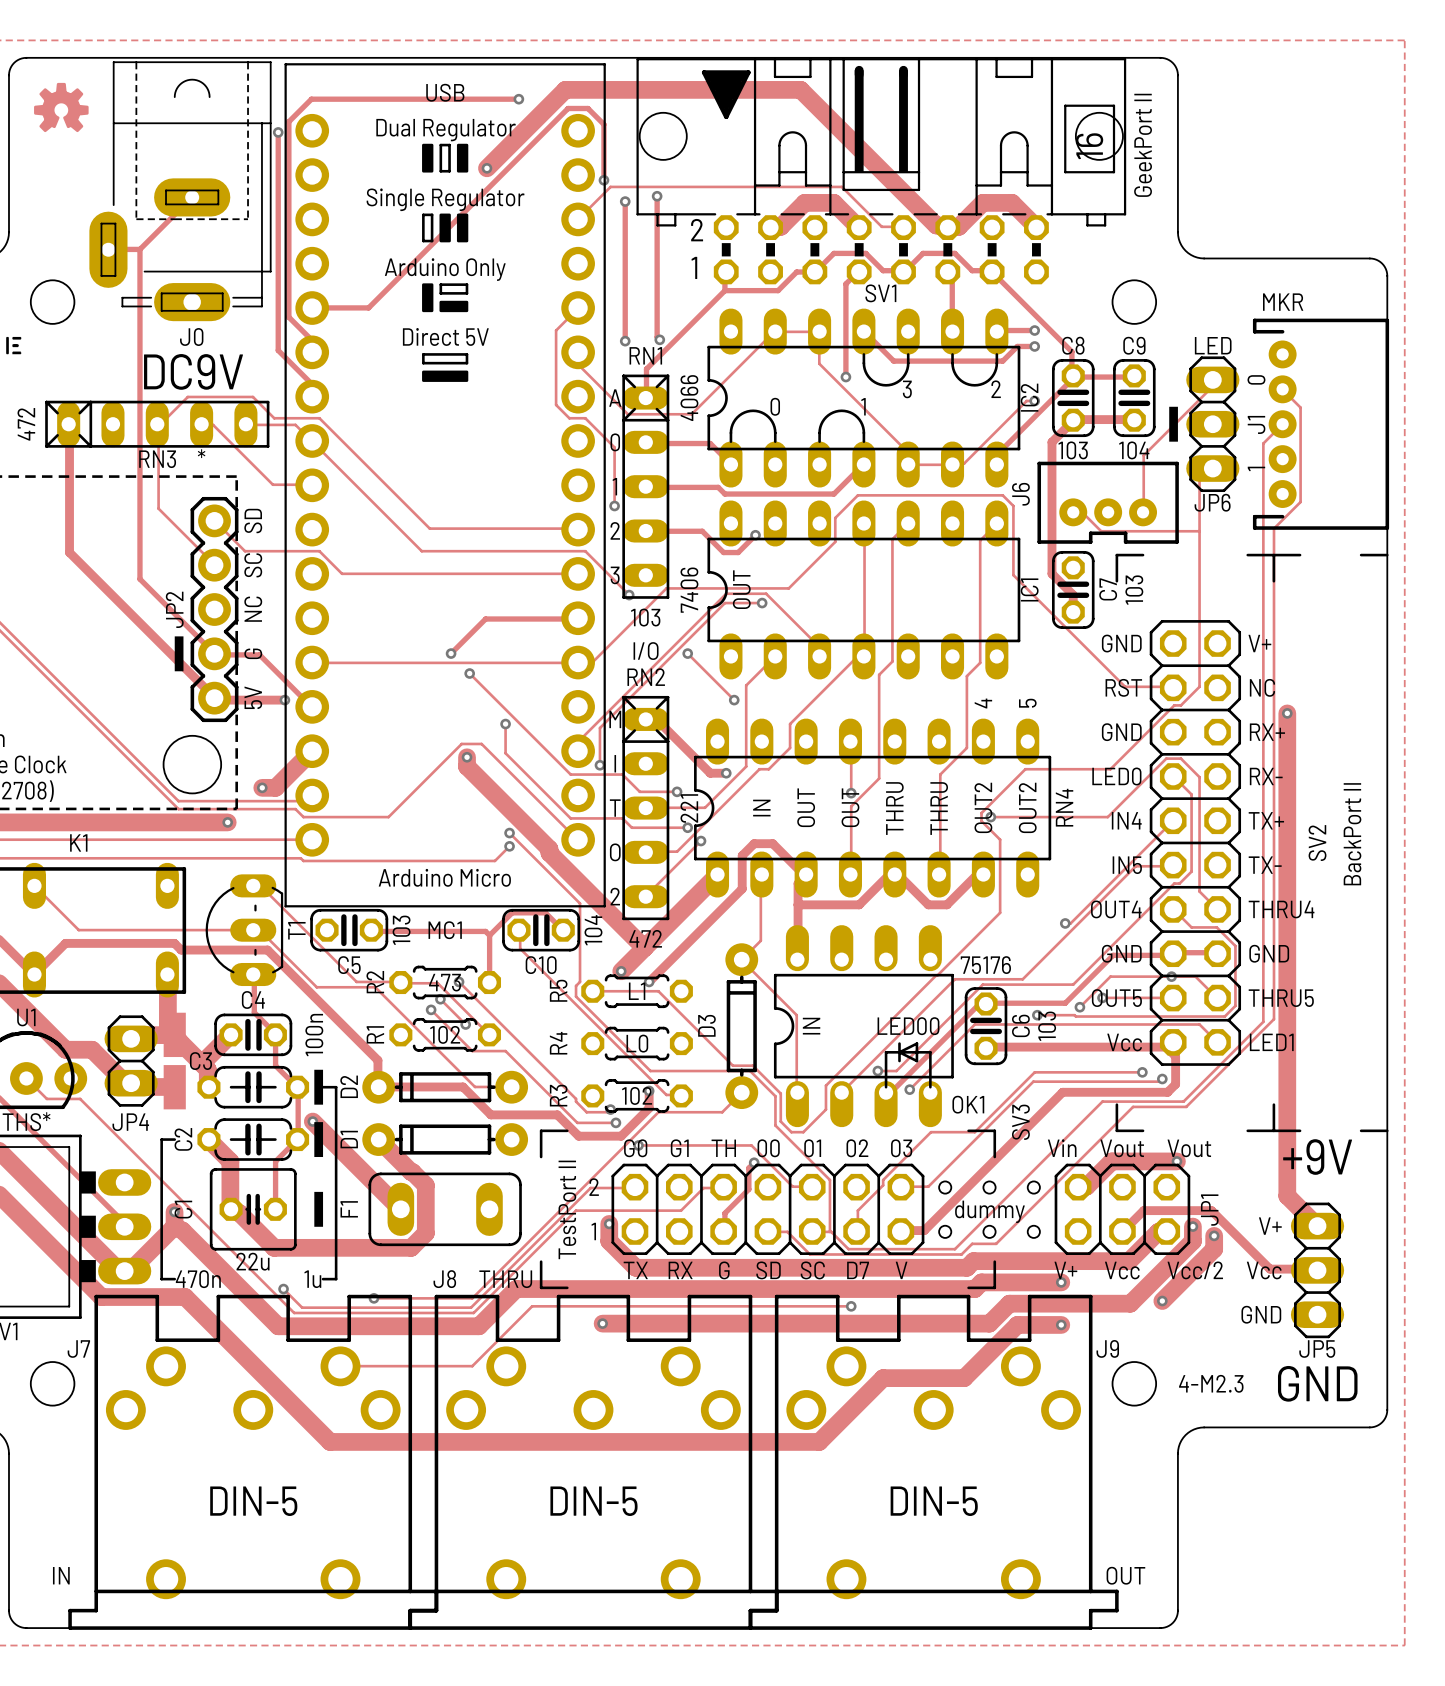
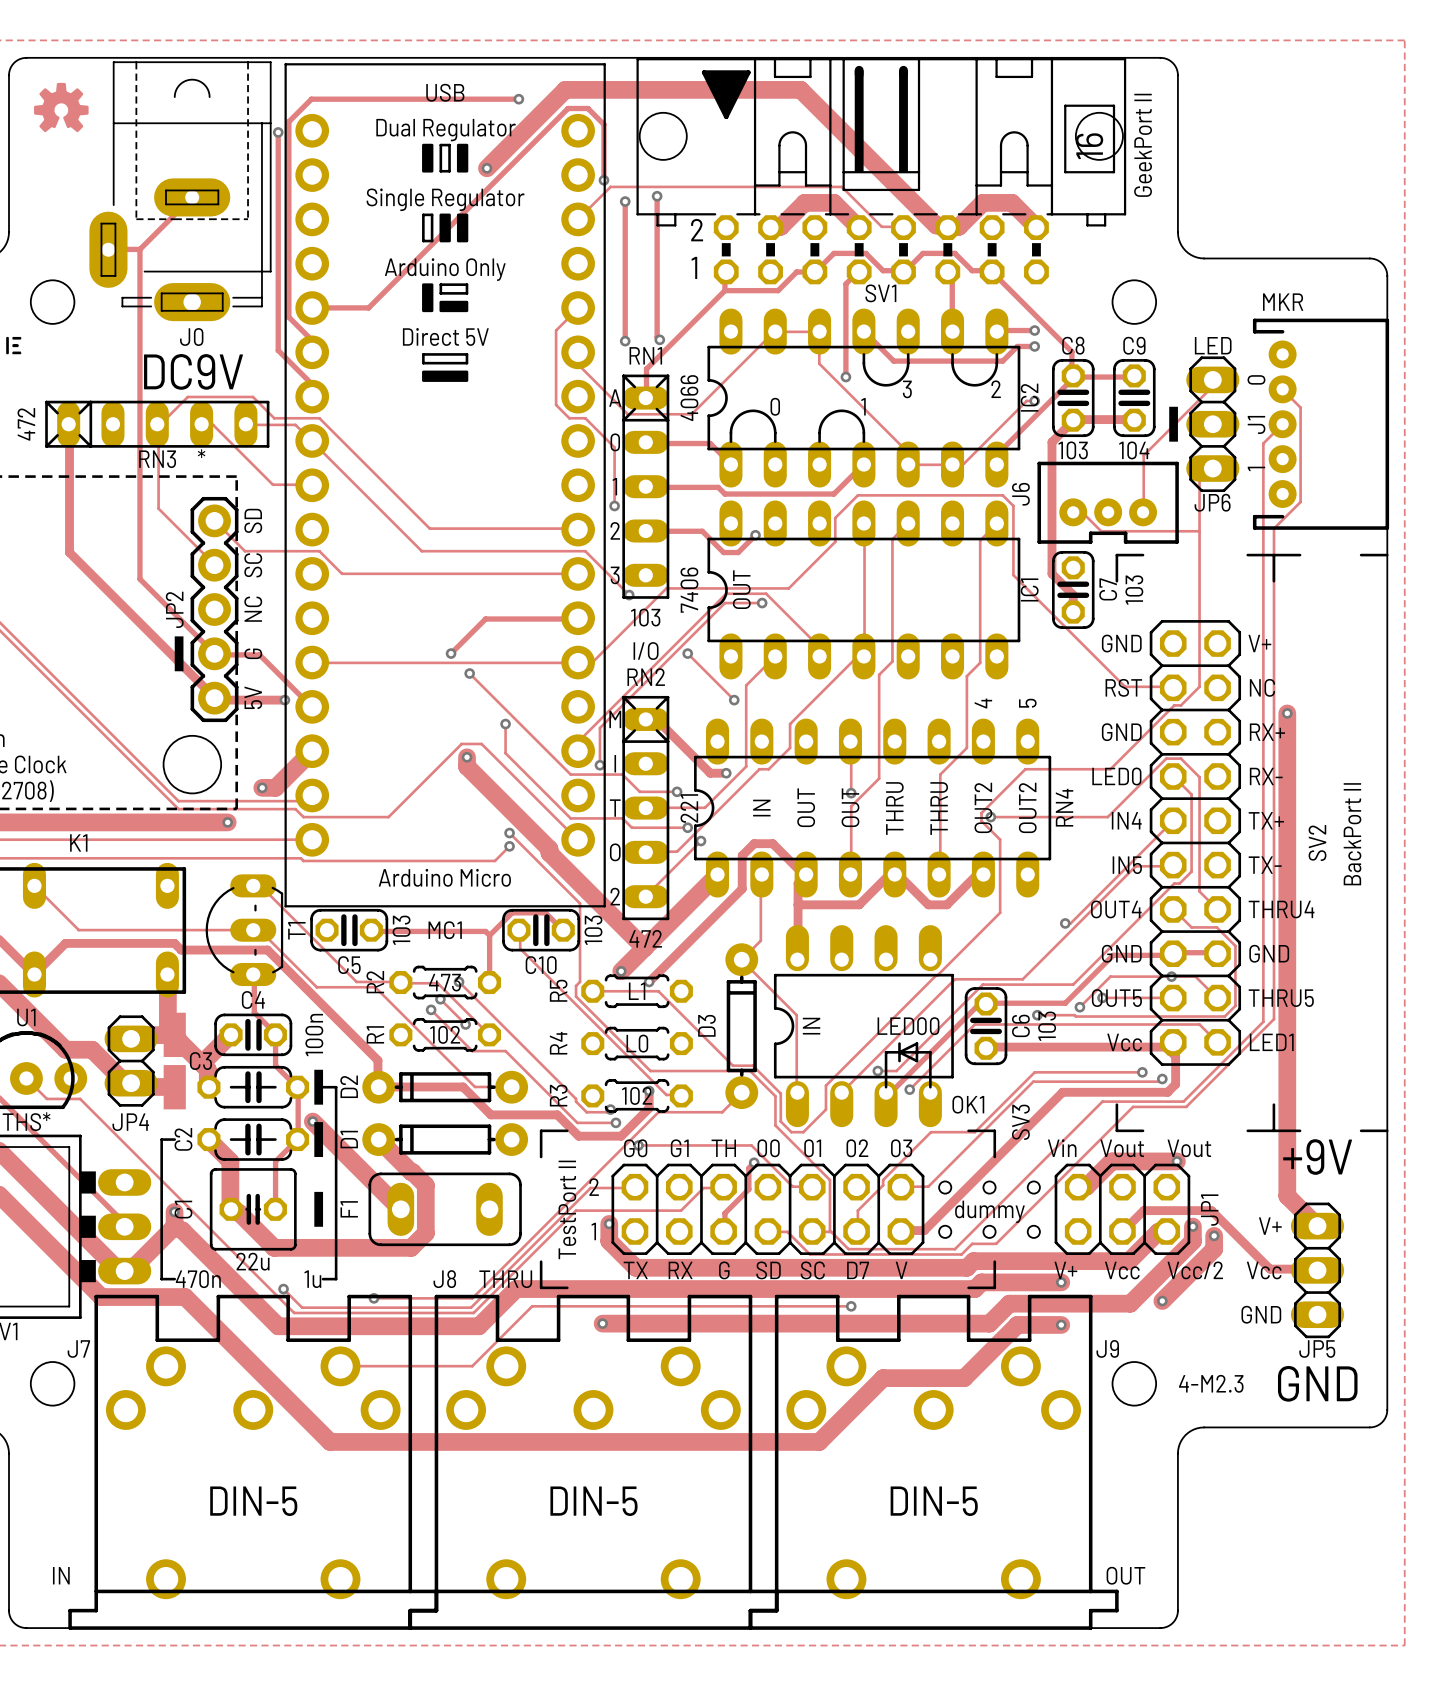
text: 104 (593, 930) -> 103 (593, 930)
text: 75176 (985, 965) -> none

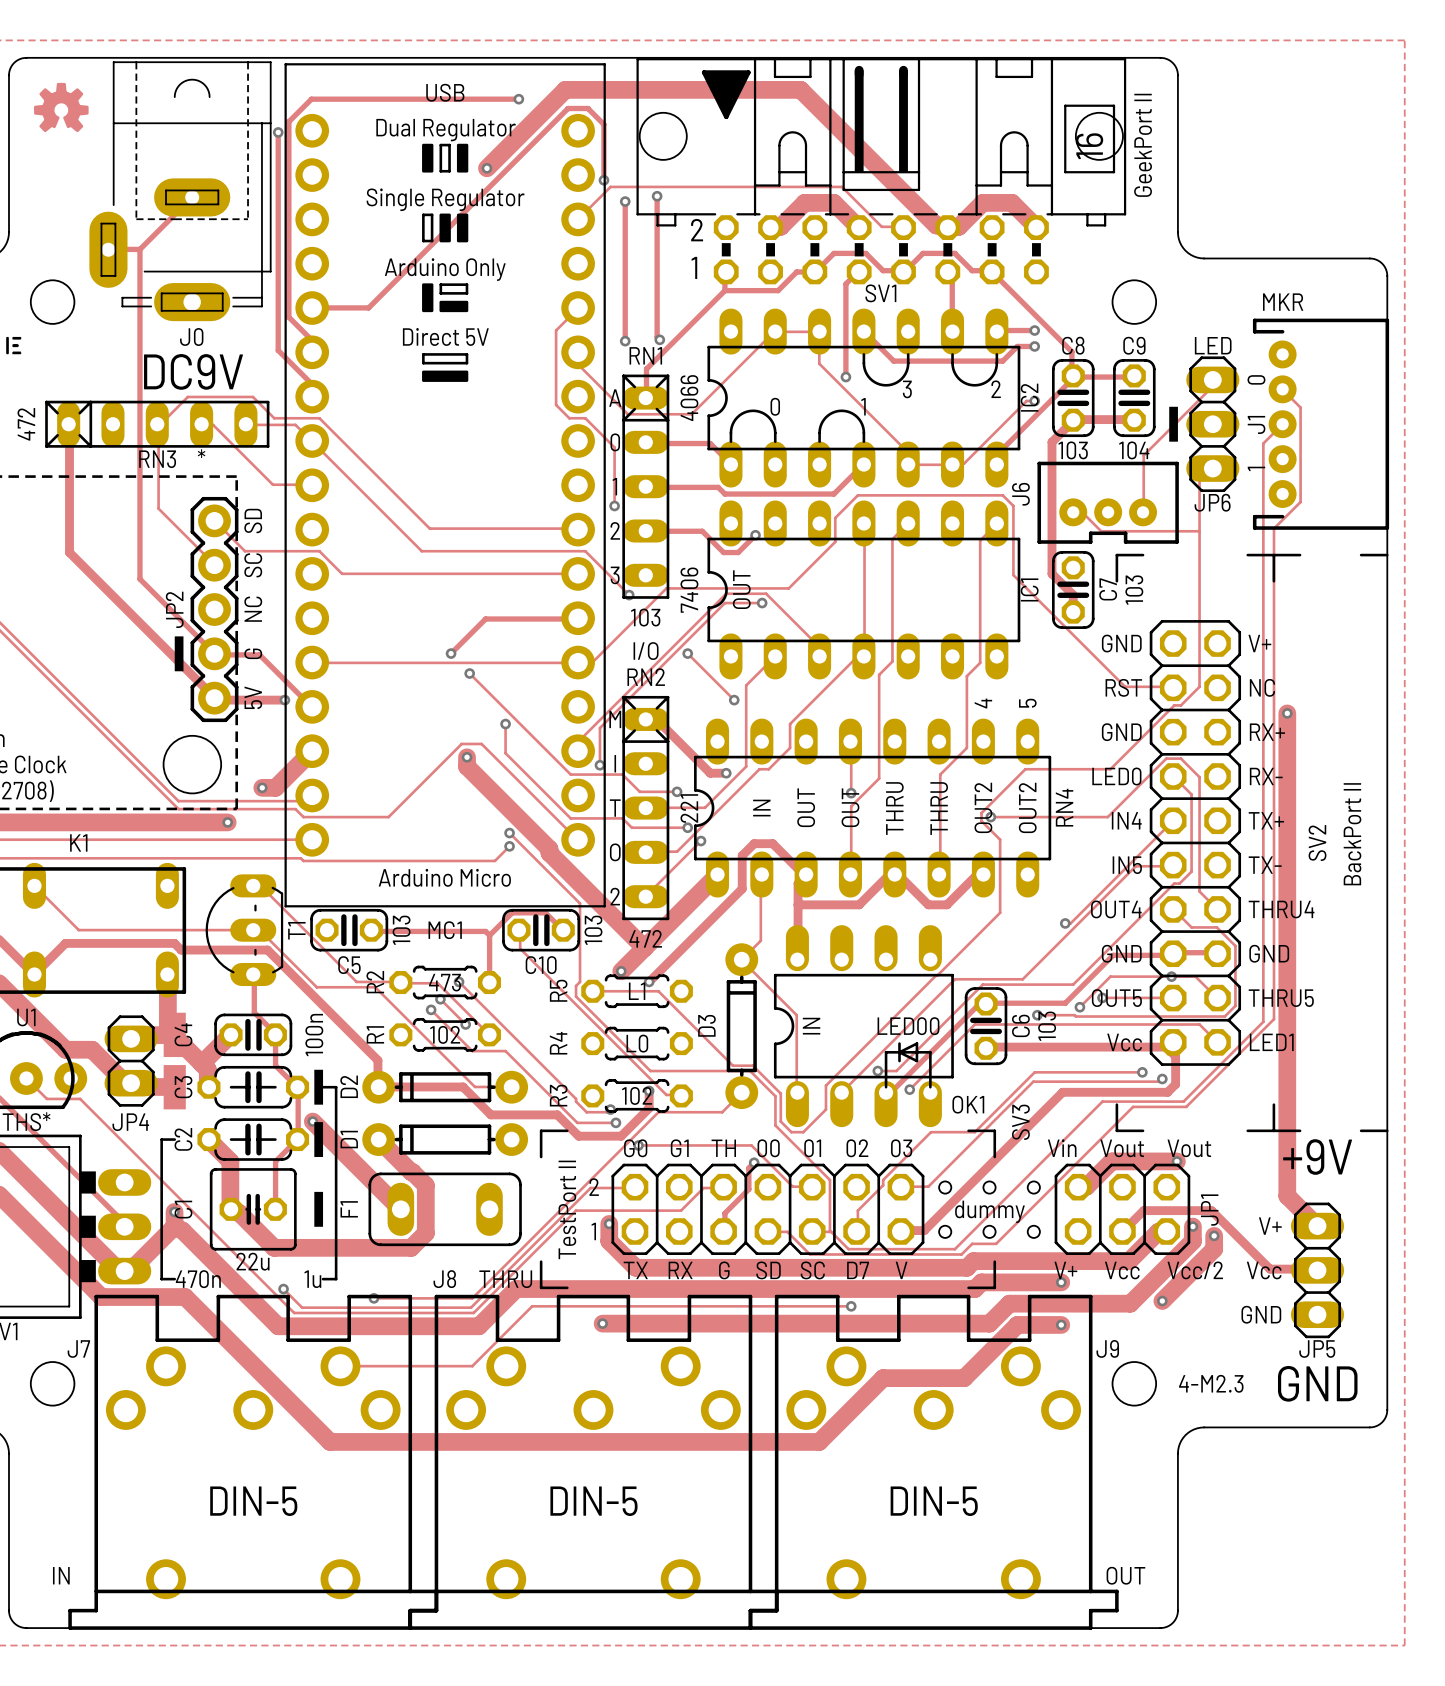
C4 name rotation: 0° (253, 999) -> 90° counterclockwise (183, 1034)
C4 name position: C4 (253, 999) -> C4 (183, 1034)
C3 name rotation: 0° (200, 1061) -> 90° counterclockwise (183, 1087)

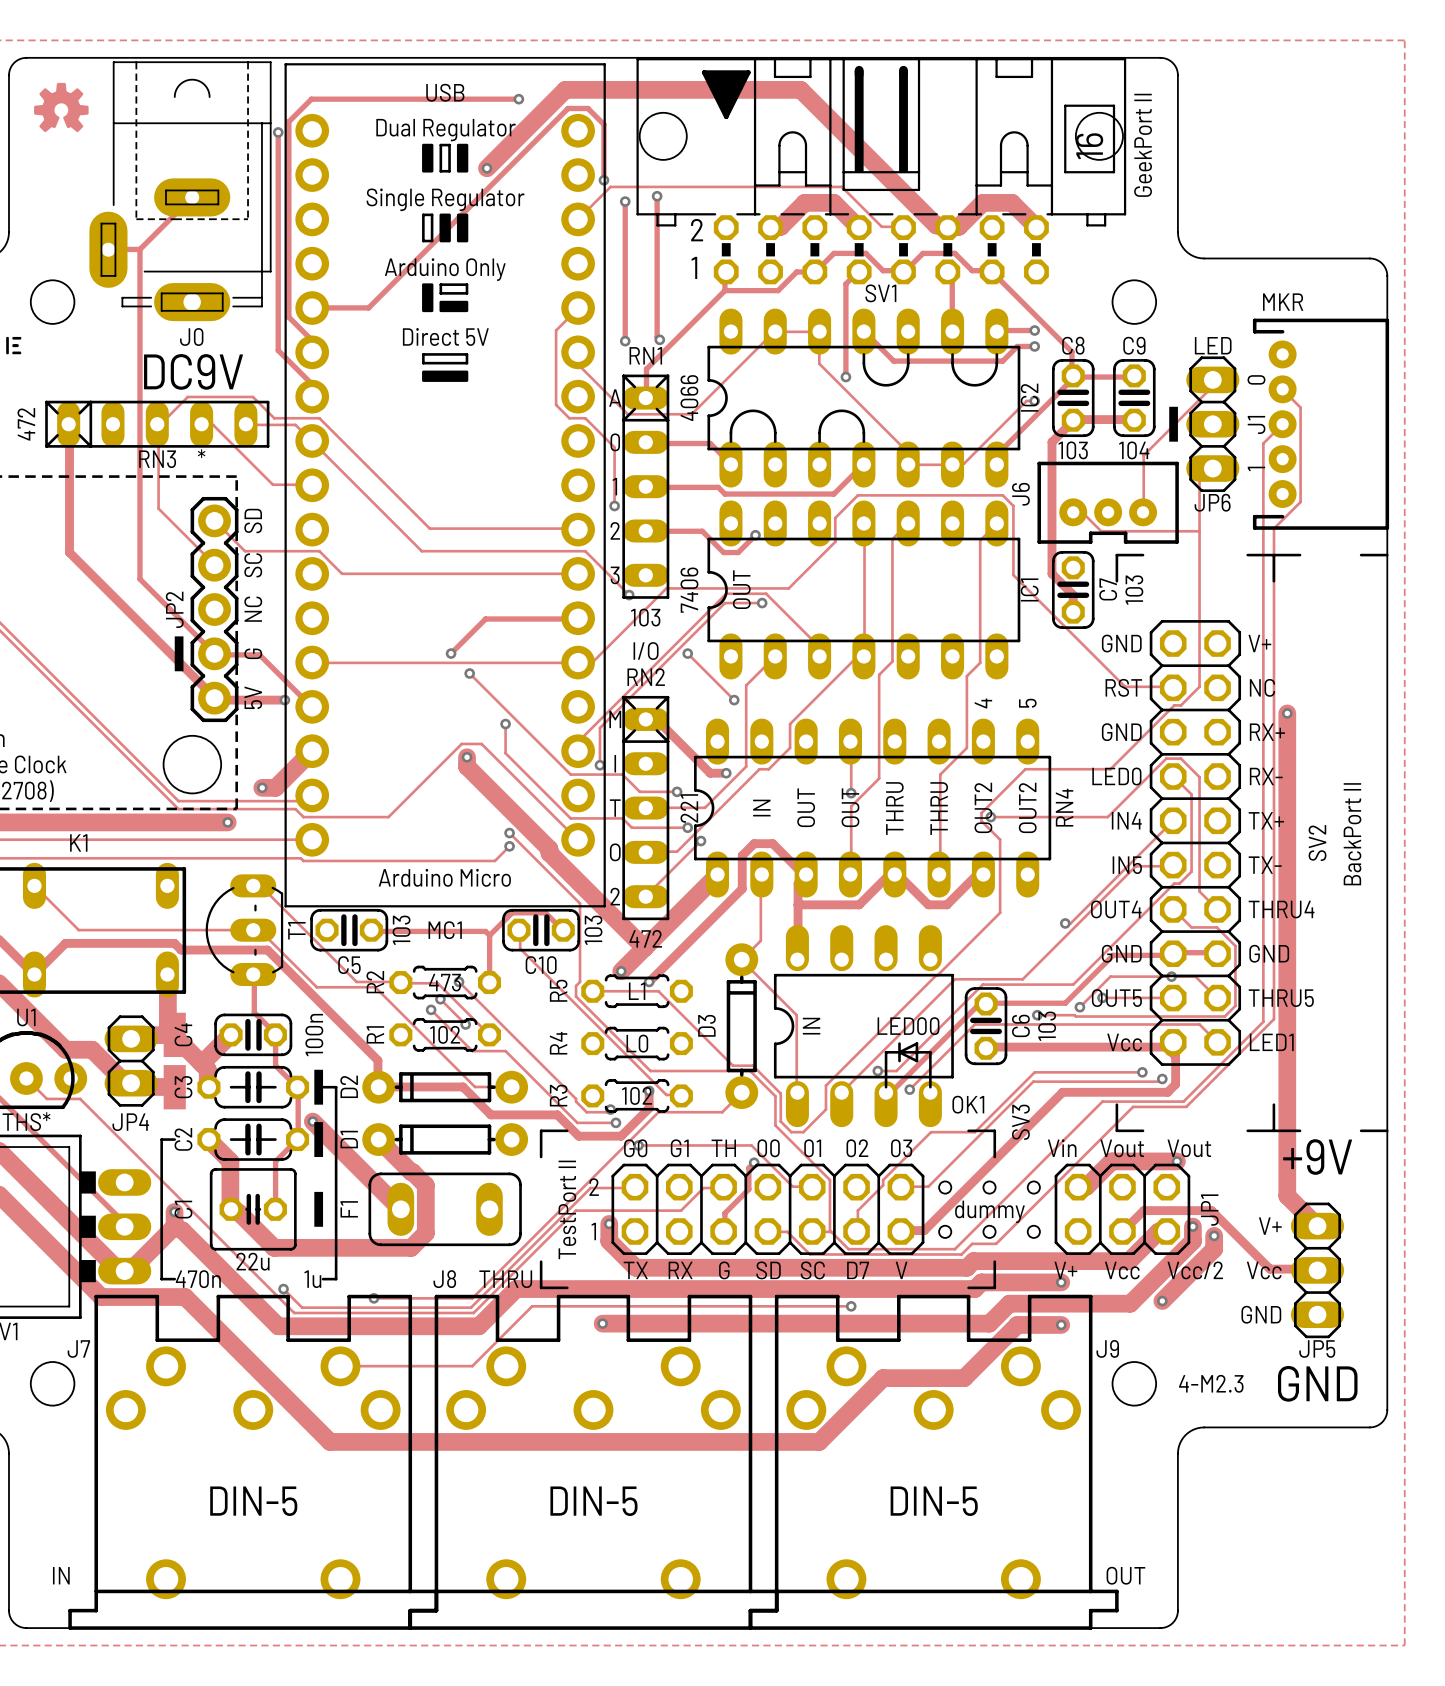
text: 3 (907, 389) -> none
text: 2 (996, 389) -> none
text: 0 (775, 406) -> none
text: 1 (863, 406) -> none

